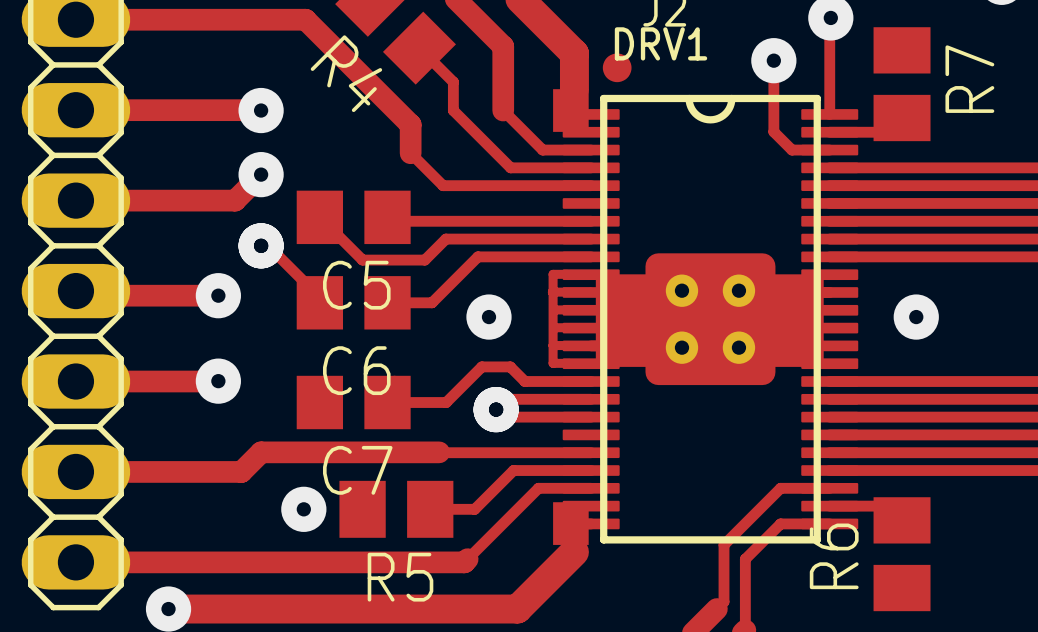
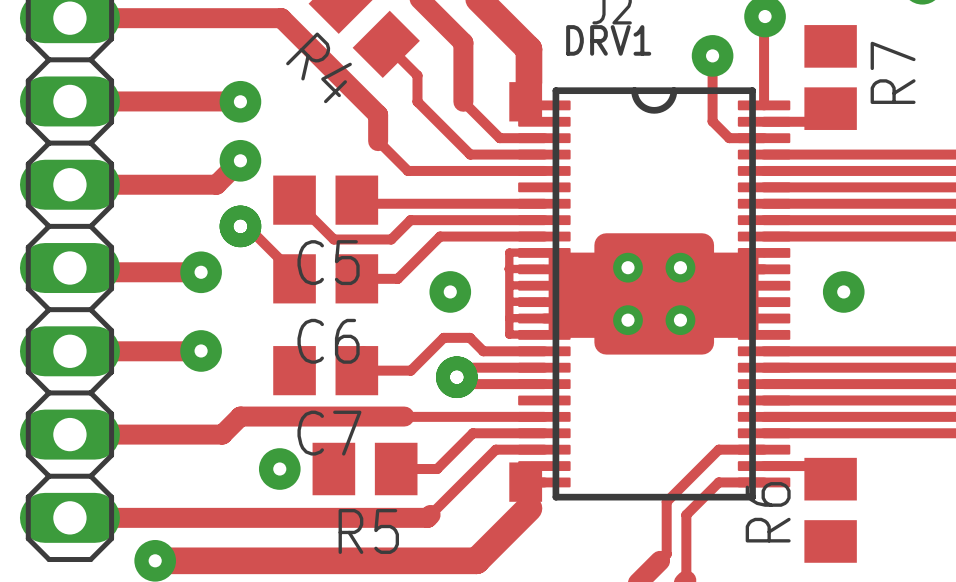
drawing: [602, 53, 632, 83] -> none

